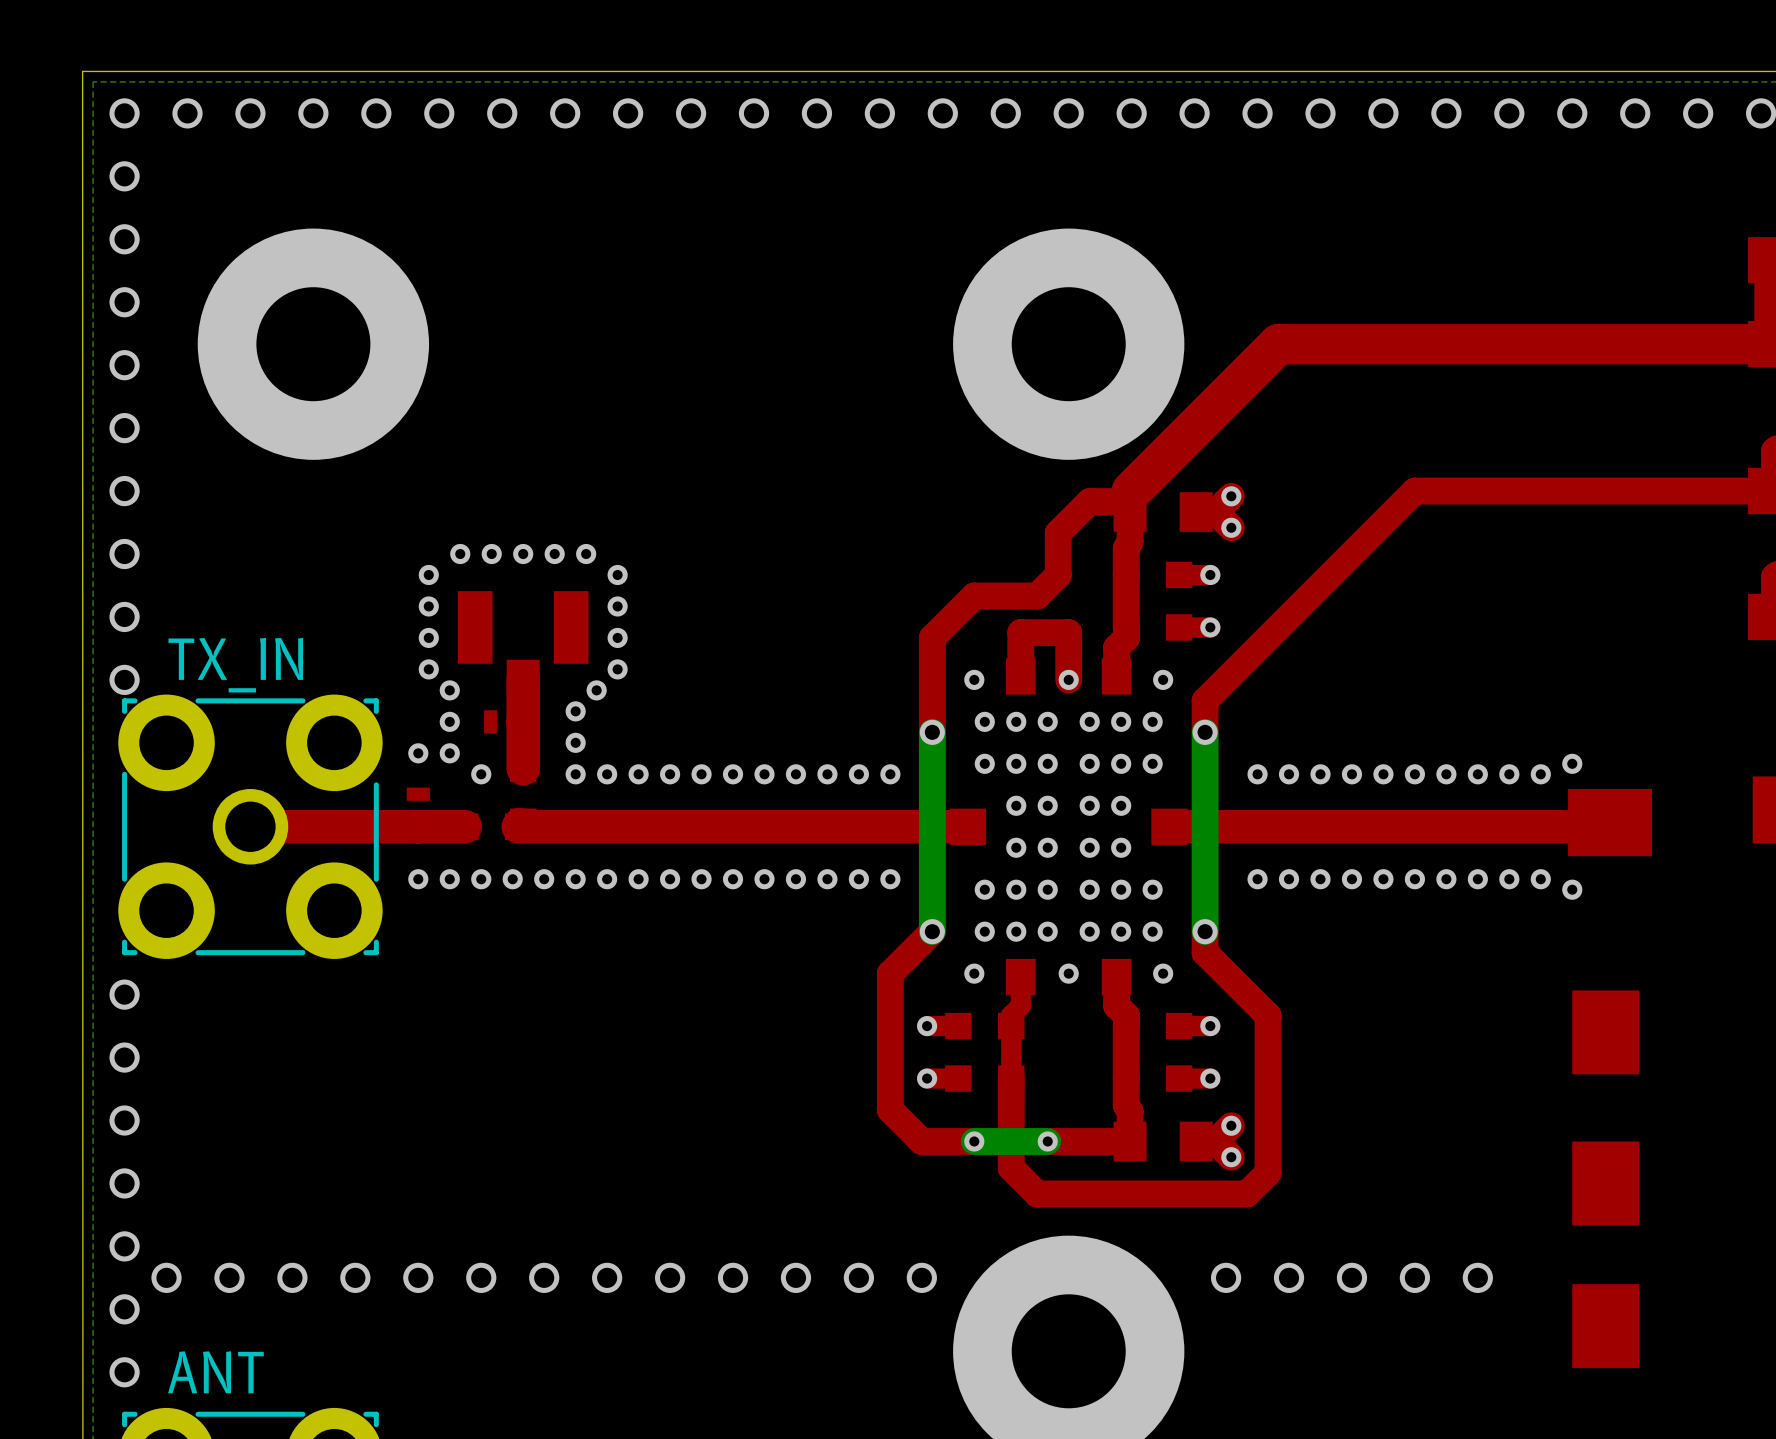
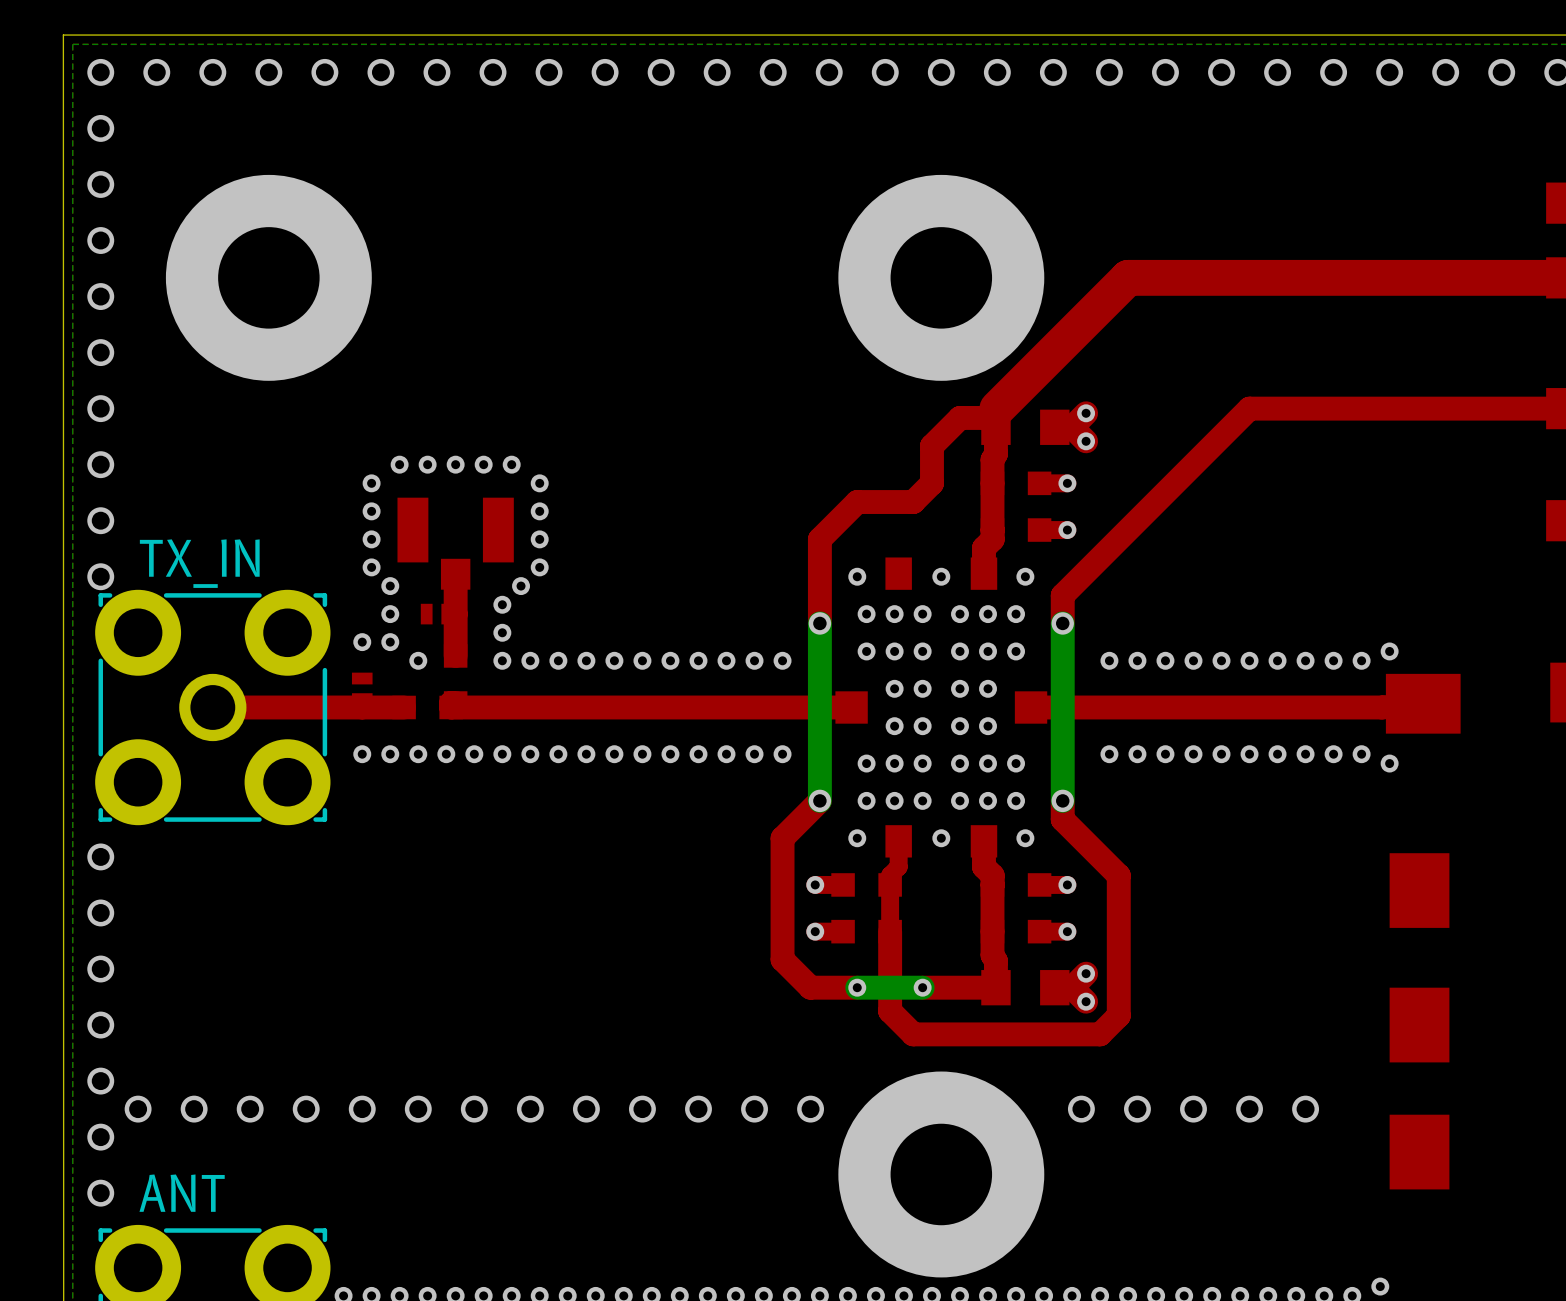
top track: (1020, 676) (1020, 632) (1068, 632) (1068, 679) -> none
top track width: thick (523, 677) (523, 768) -> thin (455, 574) (455, 655)
top track width: thick (465, 826) (250, 826) -> thin (404, 707) (212, 707)
top track width: thick (967, 826) (518, 826) -> thin (851, 707) (451, 707)
top track width: thick (1563, 826) (1169, 826) -> thin (1382, 707) (1031, 707)

